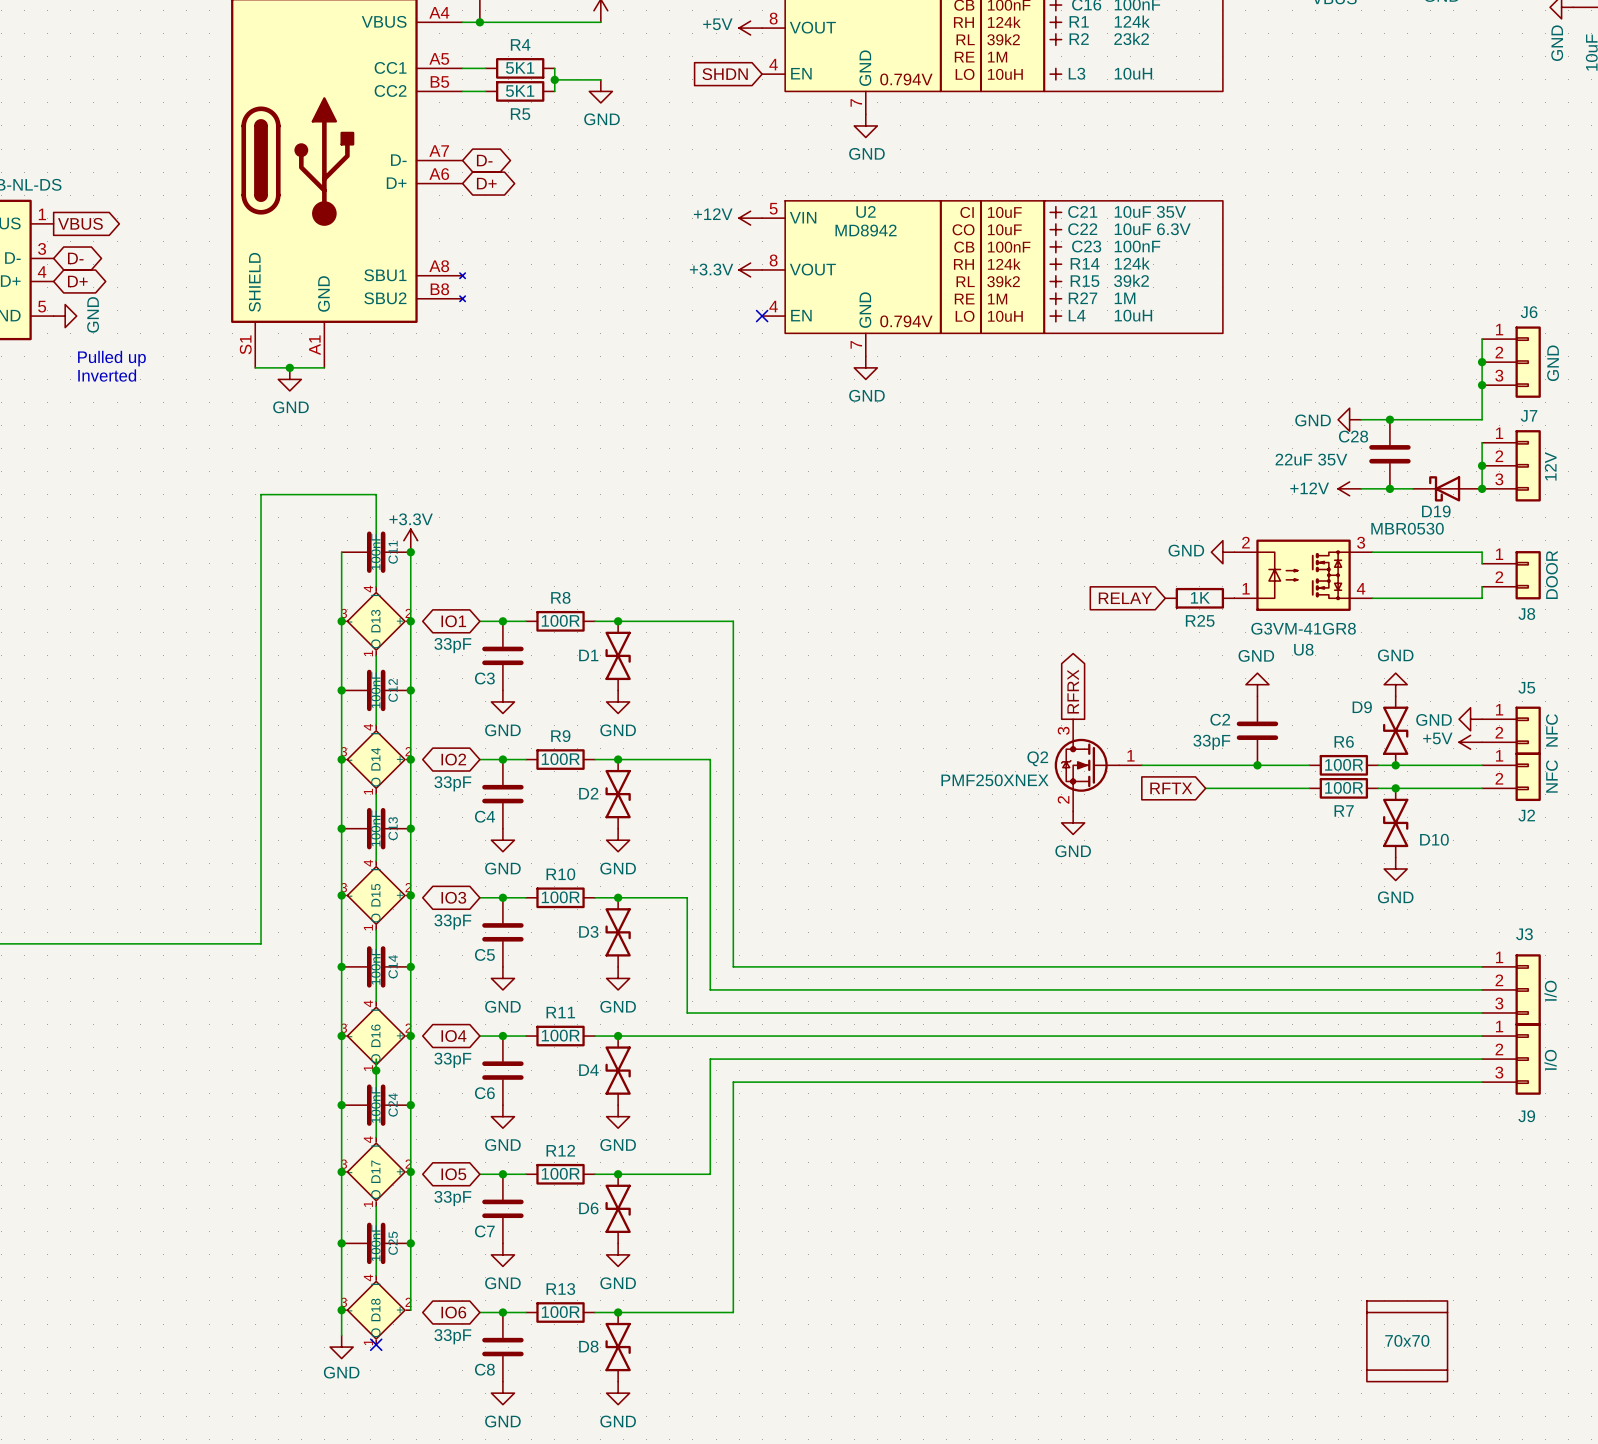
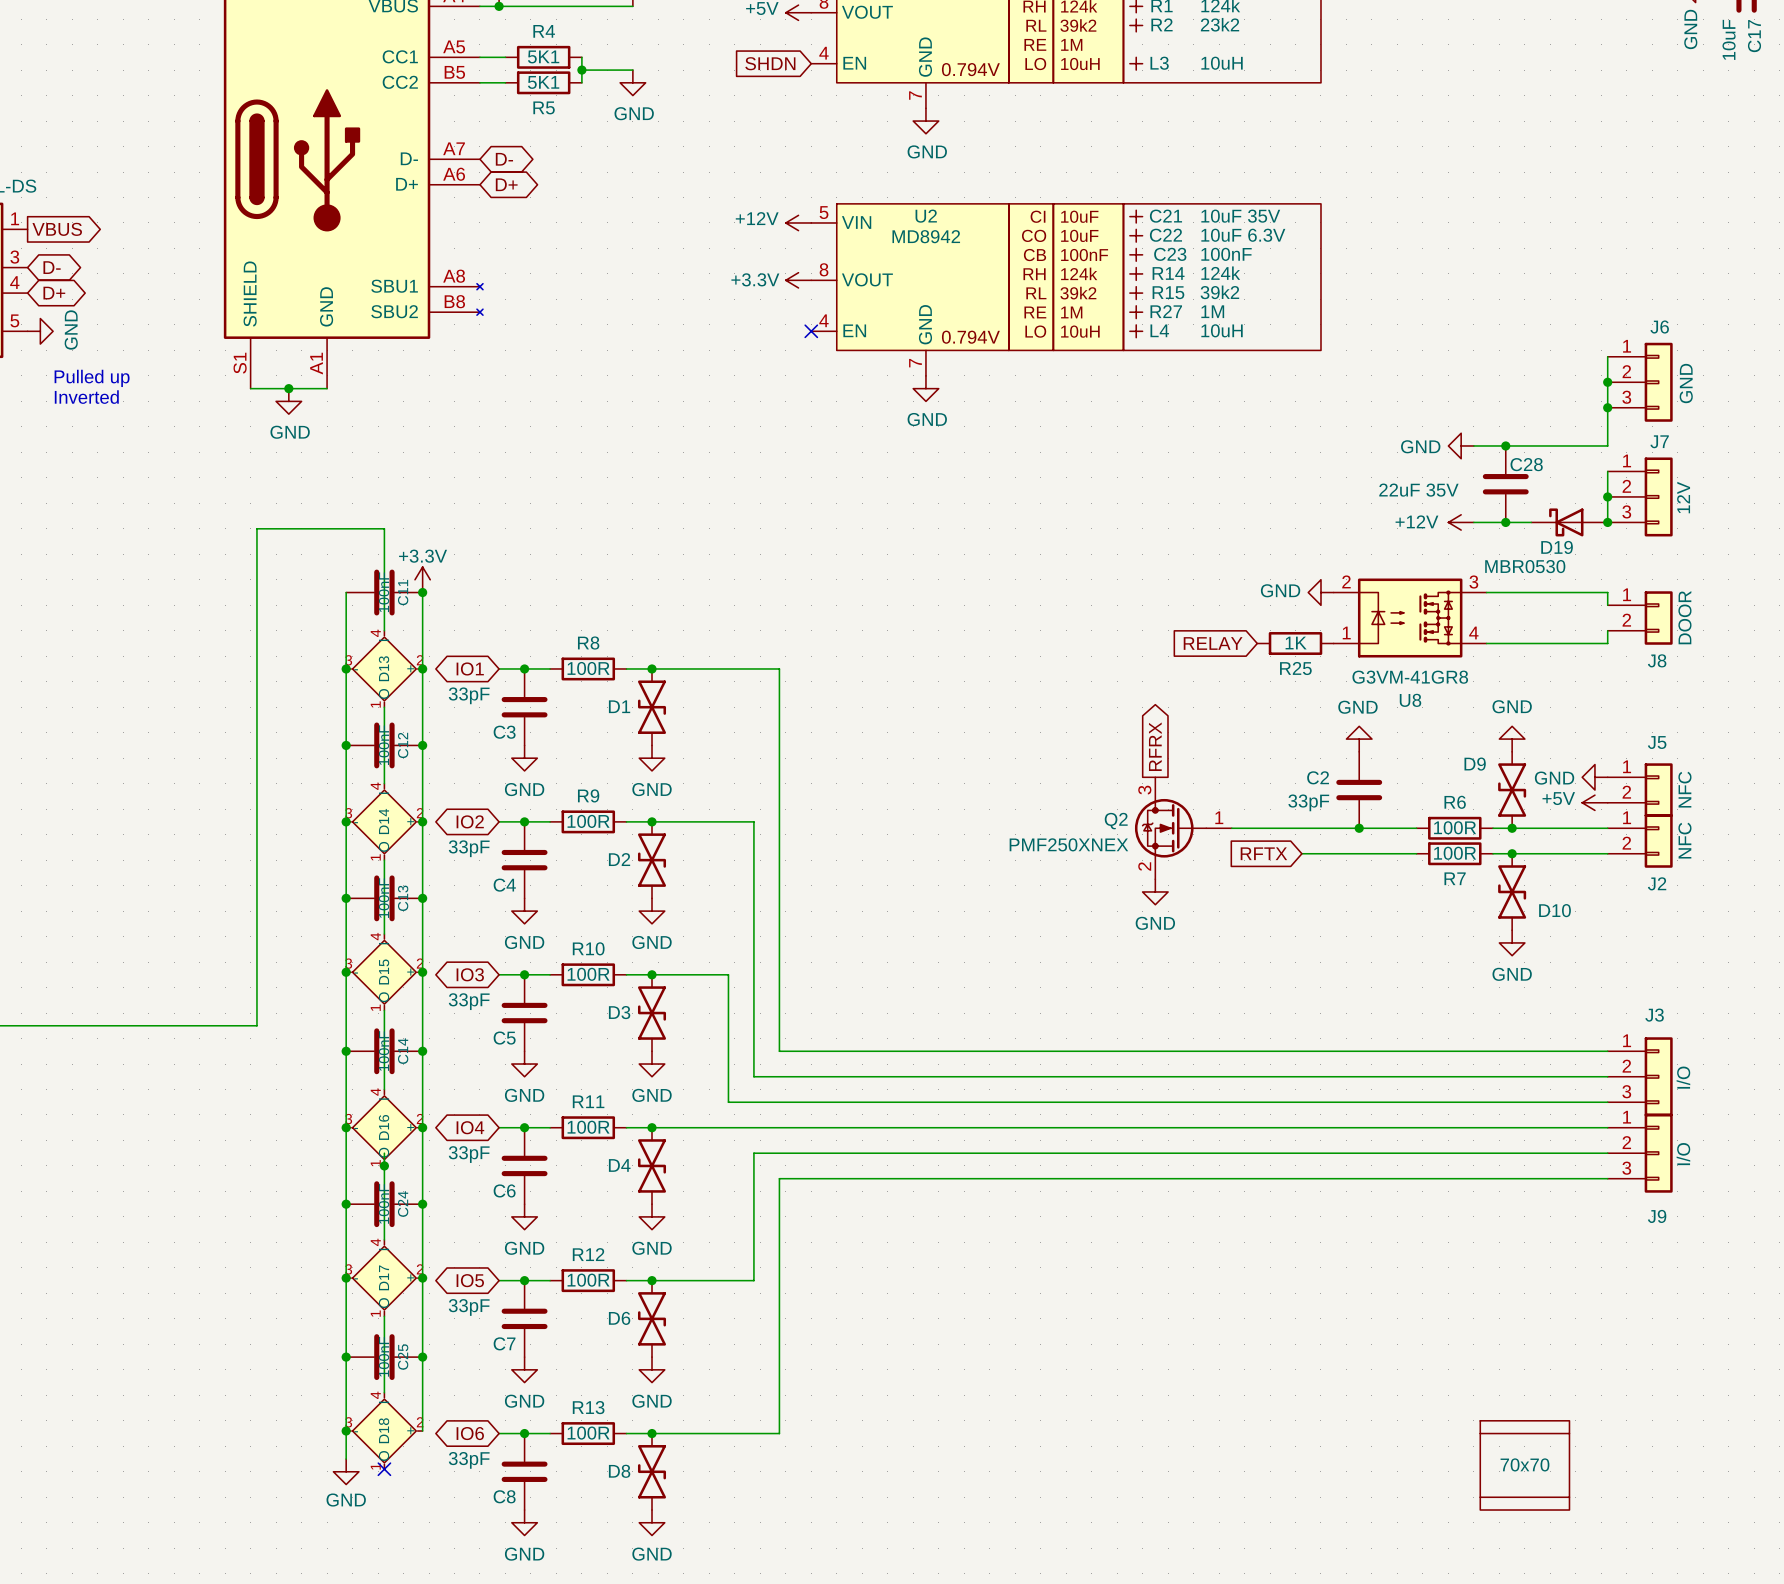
C28 name position: C28 (1353, 436) -> C28 (1526, 464)

